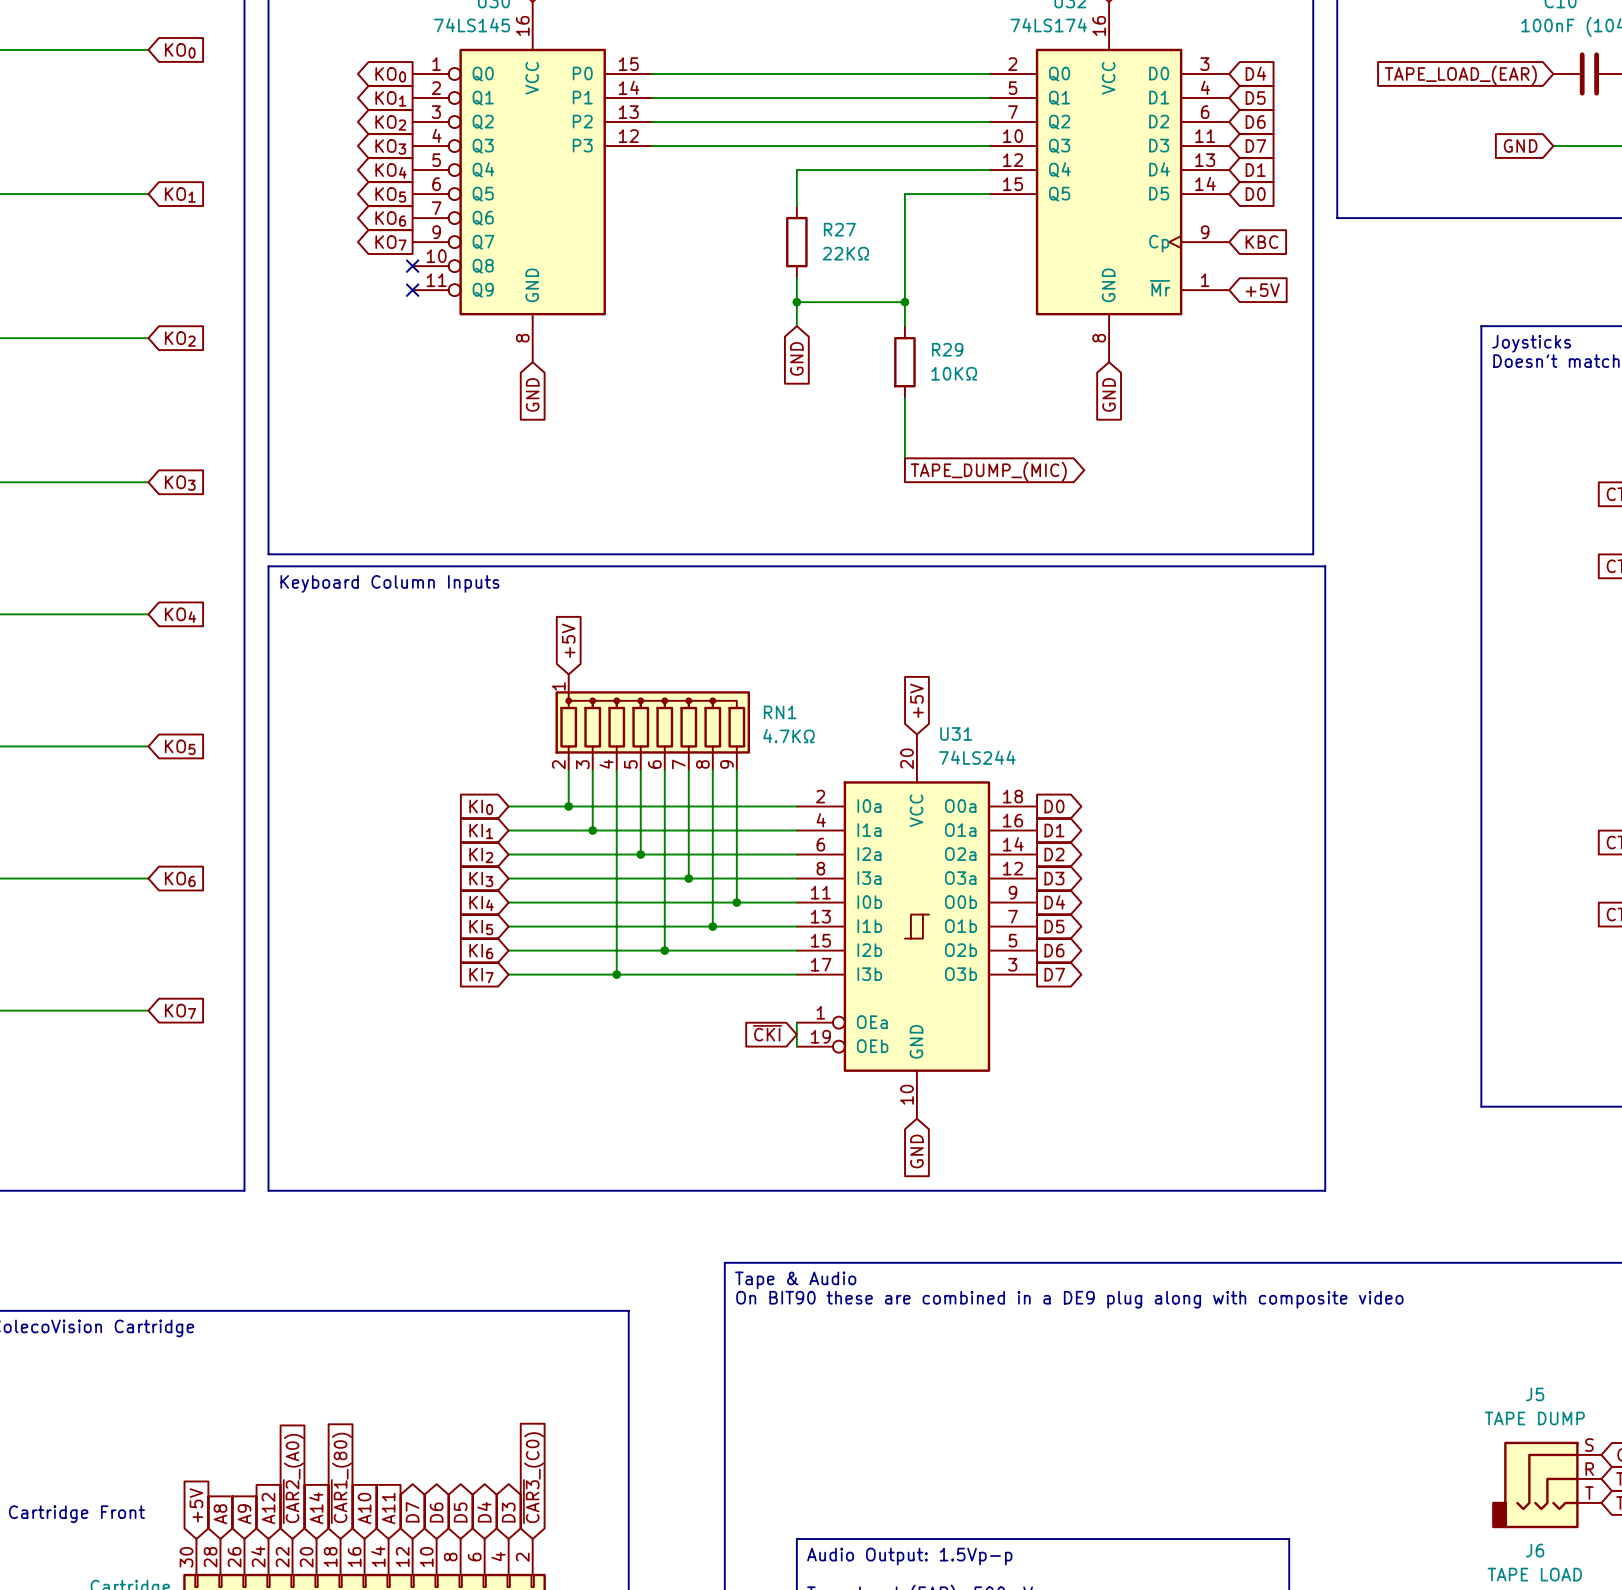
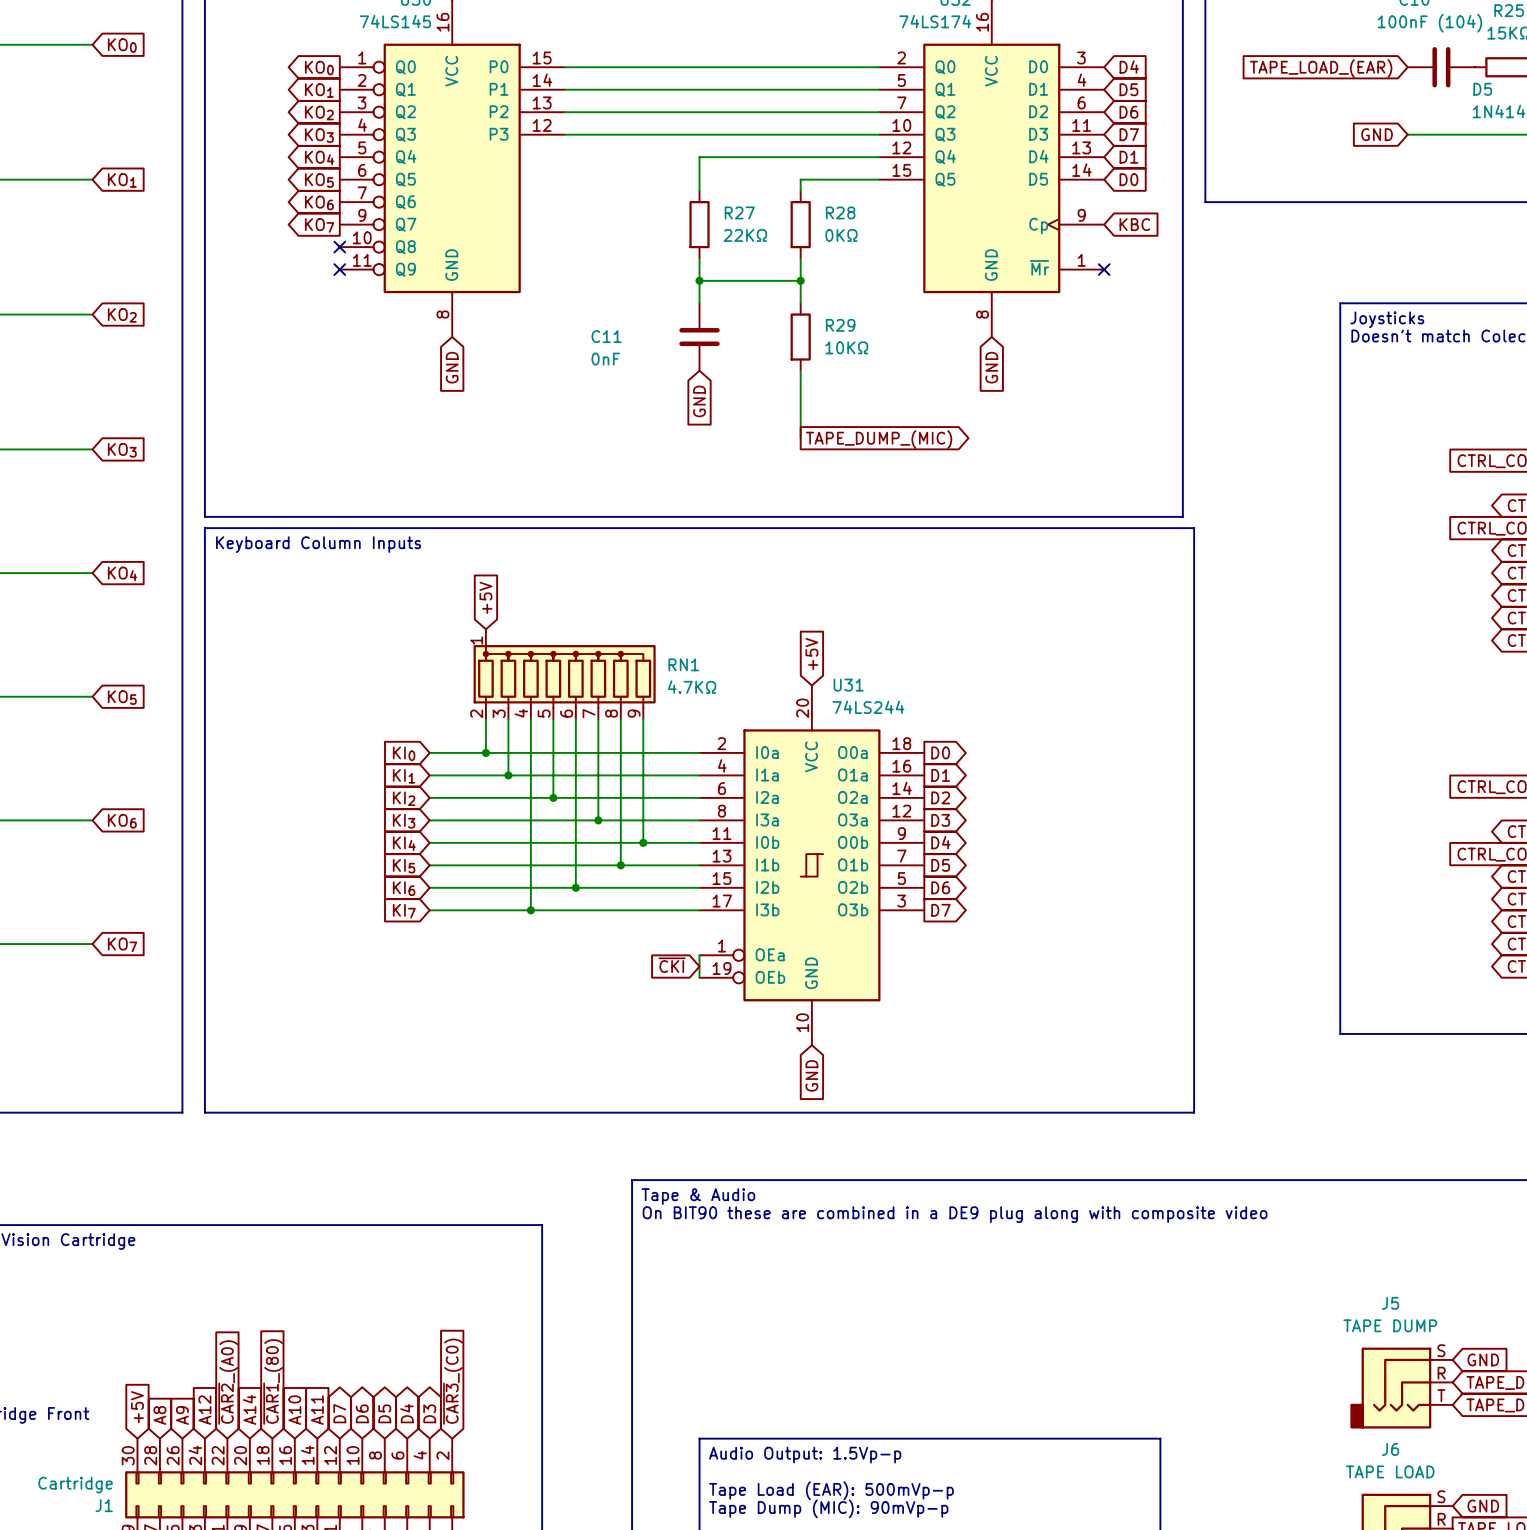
wire: (904, 206) (904, 278) -> none
R28: none -> 0KΩ (800, 224)
no-connect mark: none -> (1104, 269)
global label: +5V (1262, 290) -> none
global label position: GND (796, 358) -> GND (699, 401)
C11: none -> 0nF (699, 337)

